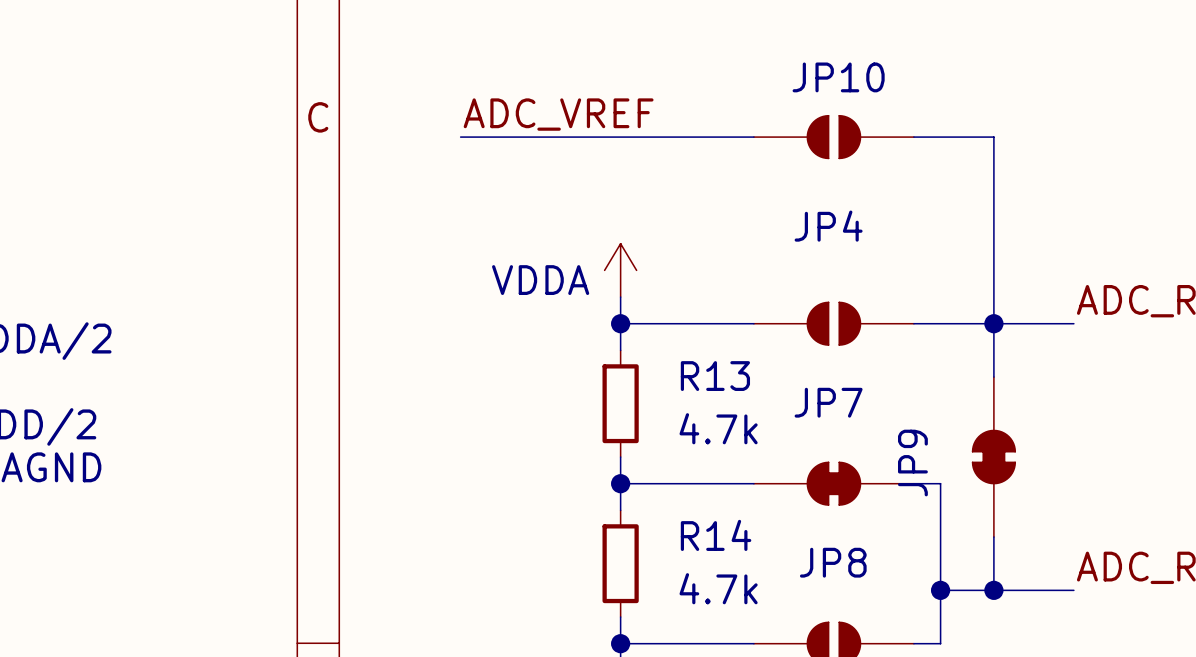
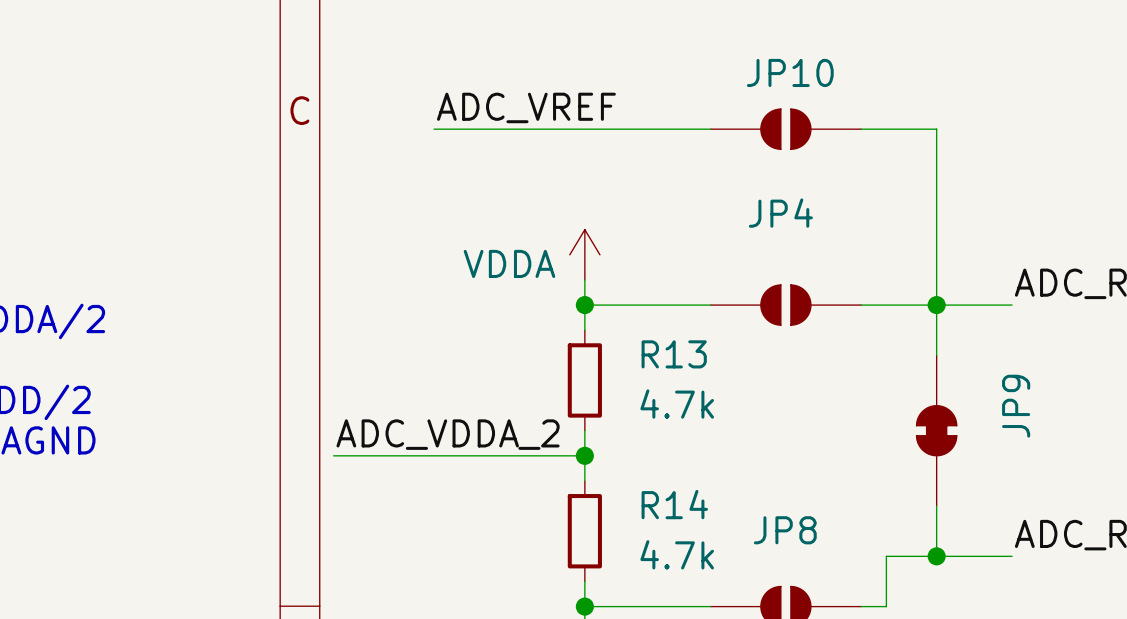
label: none -> ADC_VDDA_2 (448, 434)
JP9 name position: JP9 (912, 463) -> JP9 (1016, 406)
wire: (620, 483) (753, 483) -> (584, 455) (333, 455)
JP7: (833, 483) -> none
wire: (913, 483) (940, 483) (940, 590) -> none
junction: (940, 590) -> none

